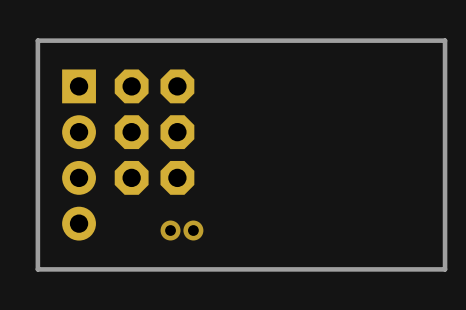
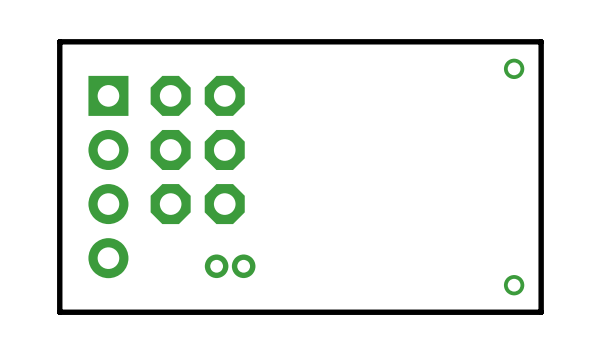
via: none -> (514, 68)
via: none -> (514, 285)

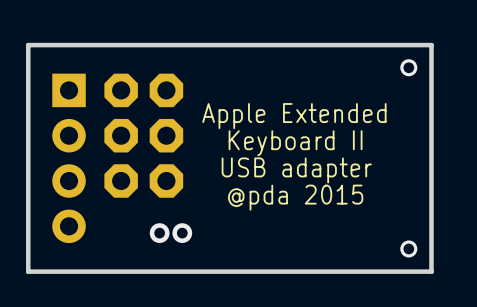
text: none -> Apple Extended (294, 116)
text: none -> Keyboard II (295, 143)
text: none -> USB adapter (296, 170)
text: none -> @pda 2015 (295, 197)

